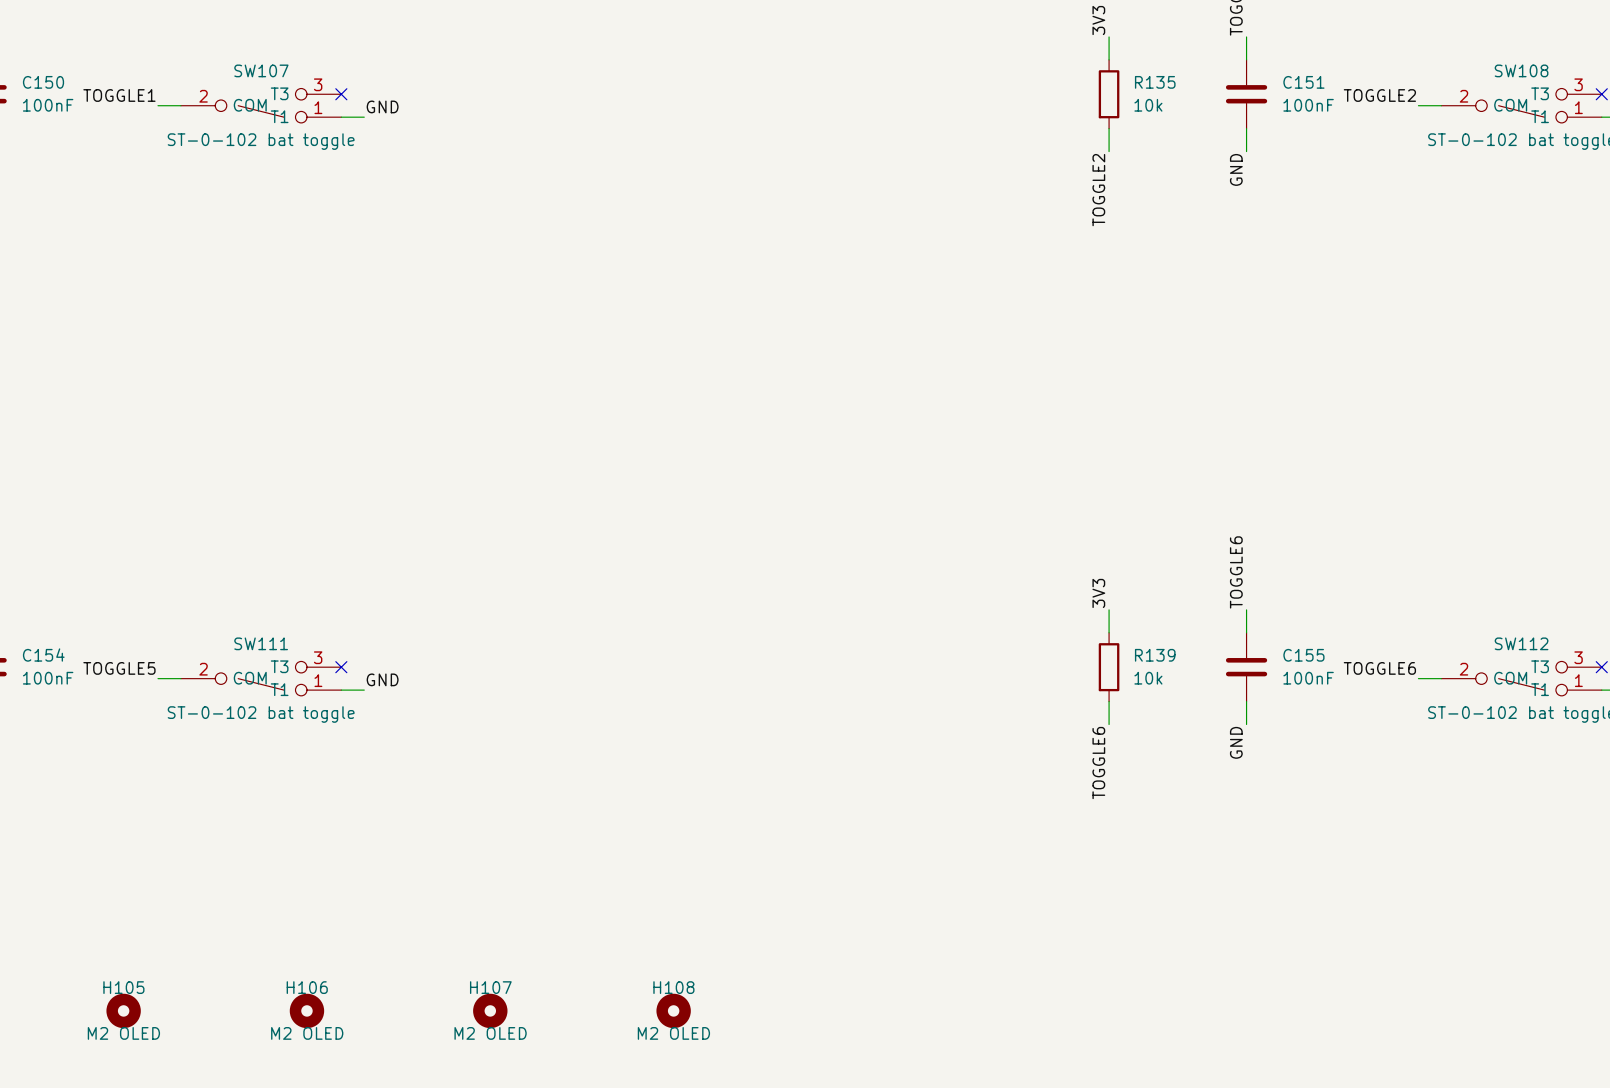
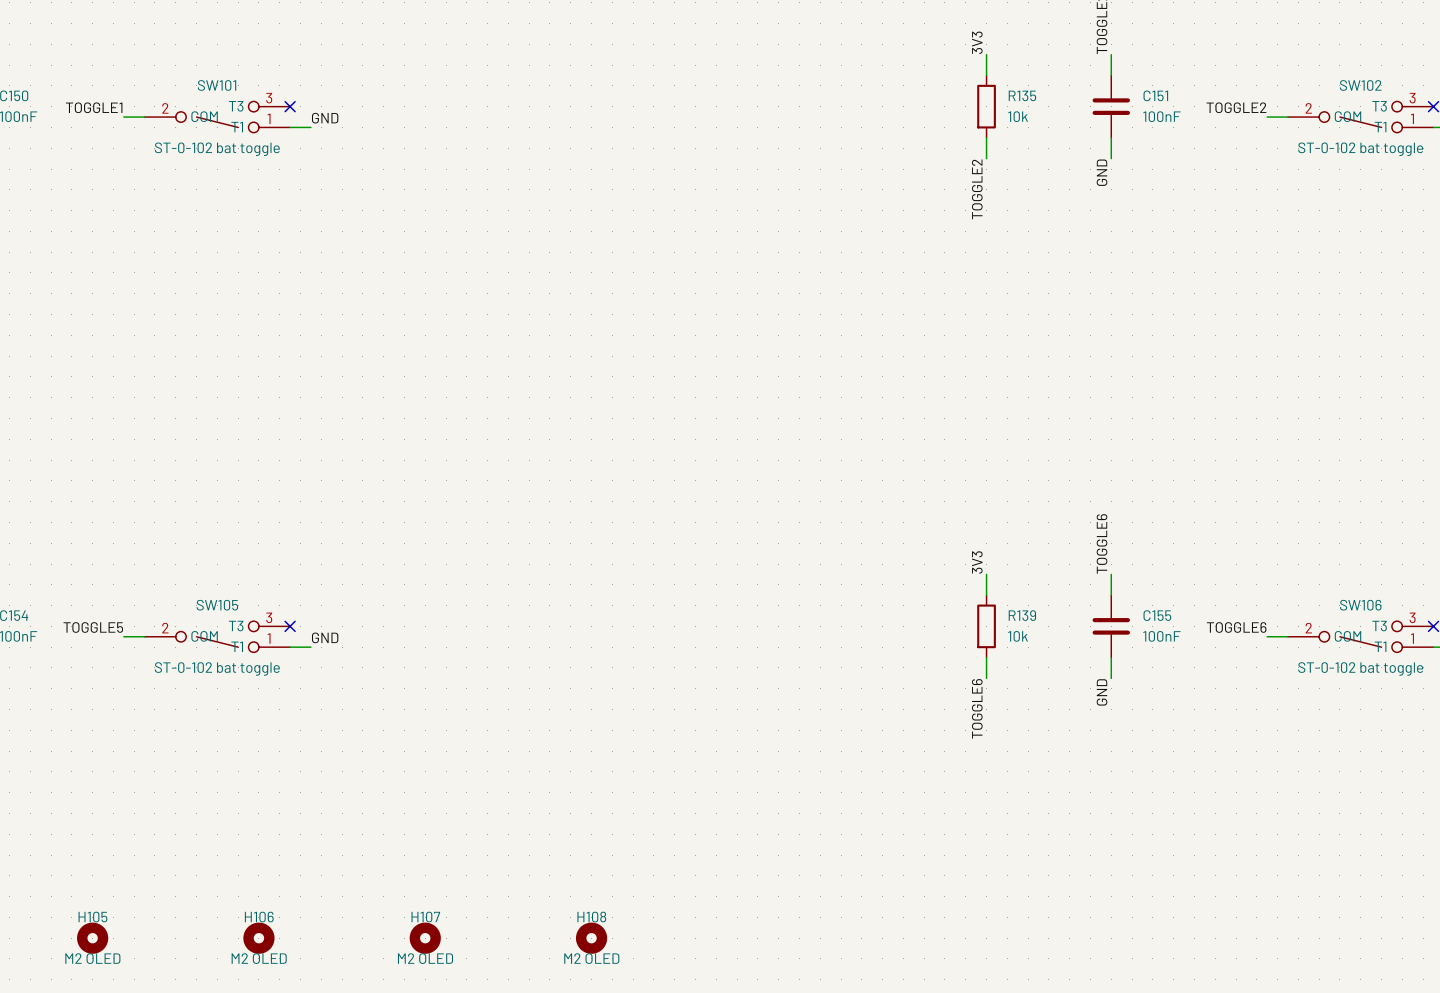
SW107 name: SW107 (261, 70) -> SW101 (217, 85)
SW108 name: SW108 (1521, 70) -> SW102 (1360, 85)
SW111 name: SW111 (261, 643) -> SW105 (217, 605)
SW112 name: SW112 (1521, 643) -> SW106 (1360, 605)

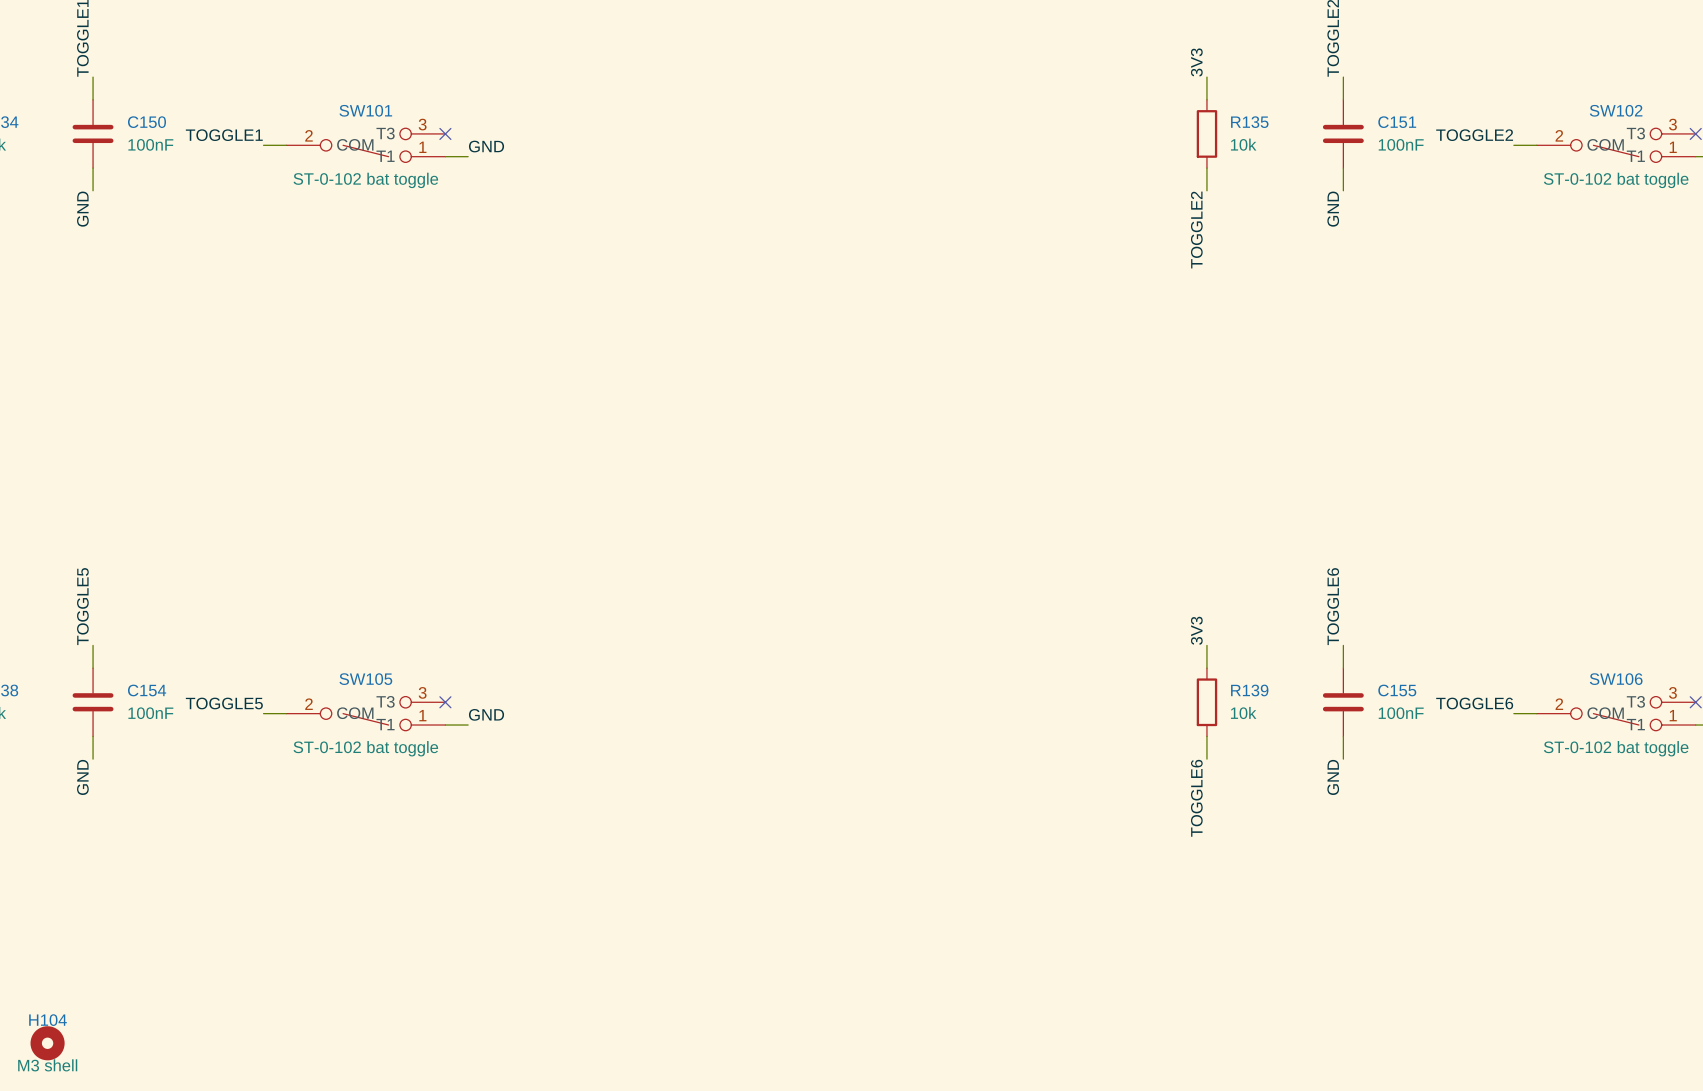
H105: M2 OLED (92, 938) -> none
H106: M2 OLED (258, 938) -> none
H107: M2 OLED (425, 938) -> none
H108: M2 OLED (591, 938) -> none

